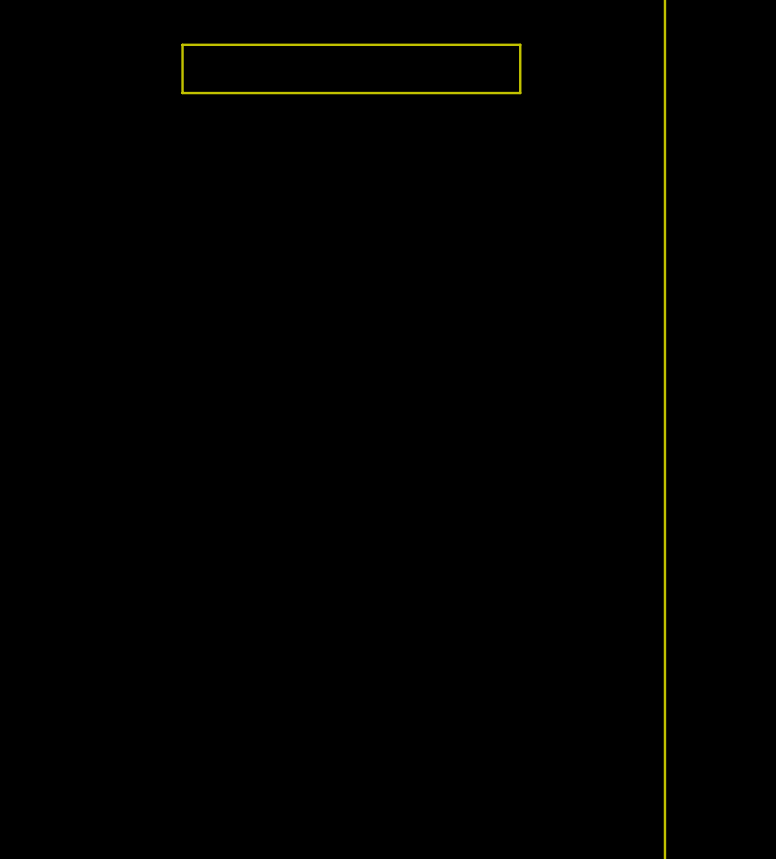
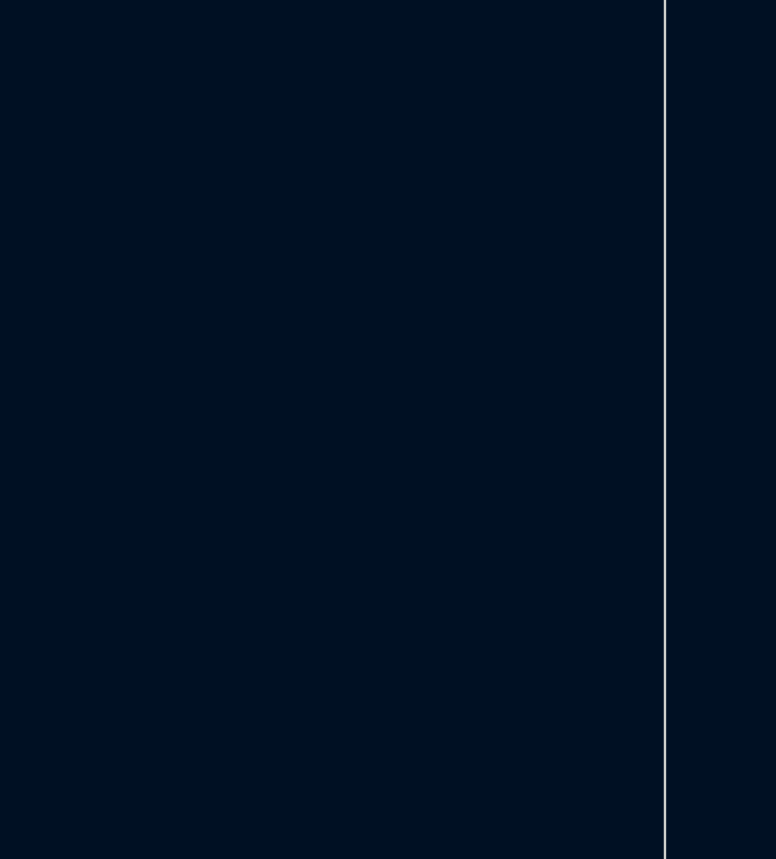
board edge: (520, 44) (520, 93) (182, 93) (182, 44) (520, 44) -> none

